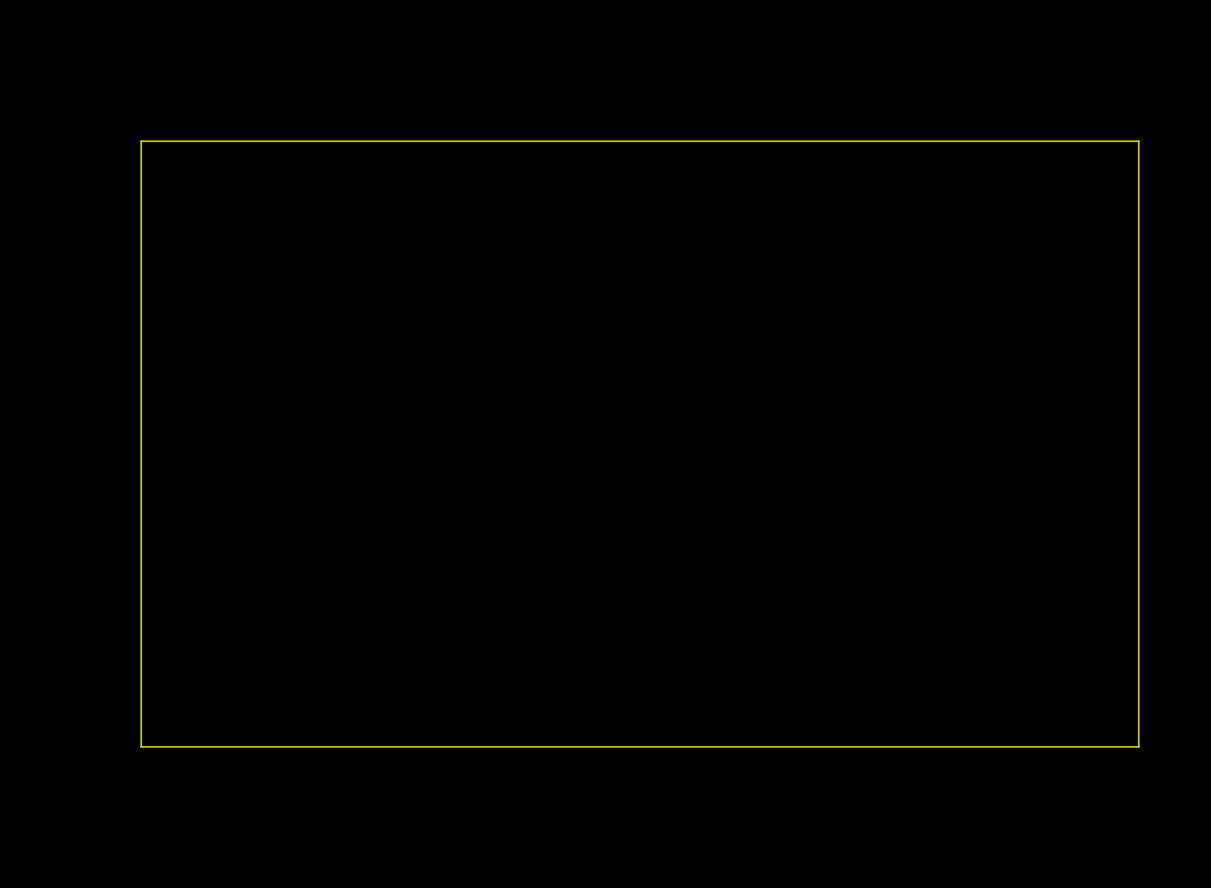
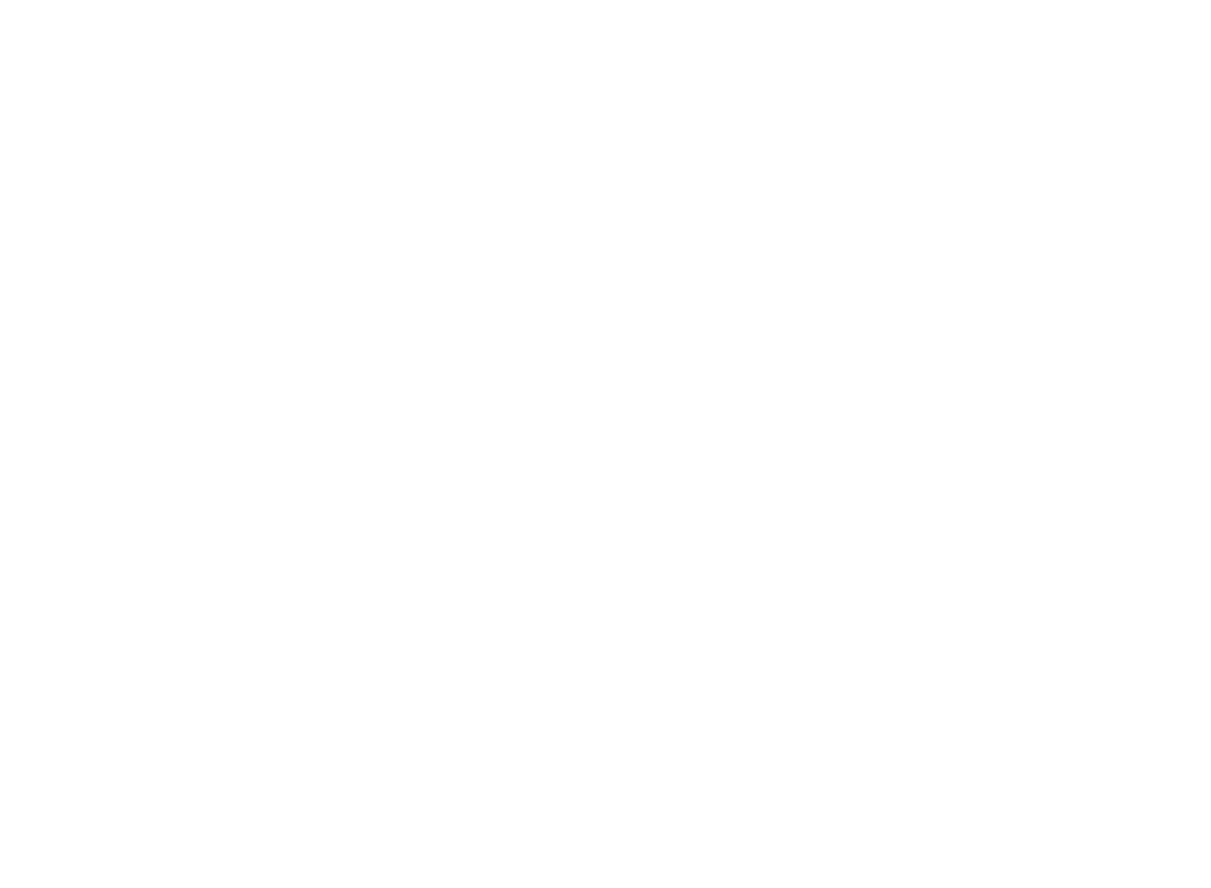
board edge: (1138, 141) (141, 141) (141, 746) (1138, 746) (1138, 141) -> none

